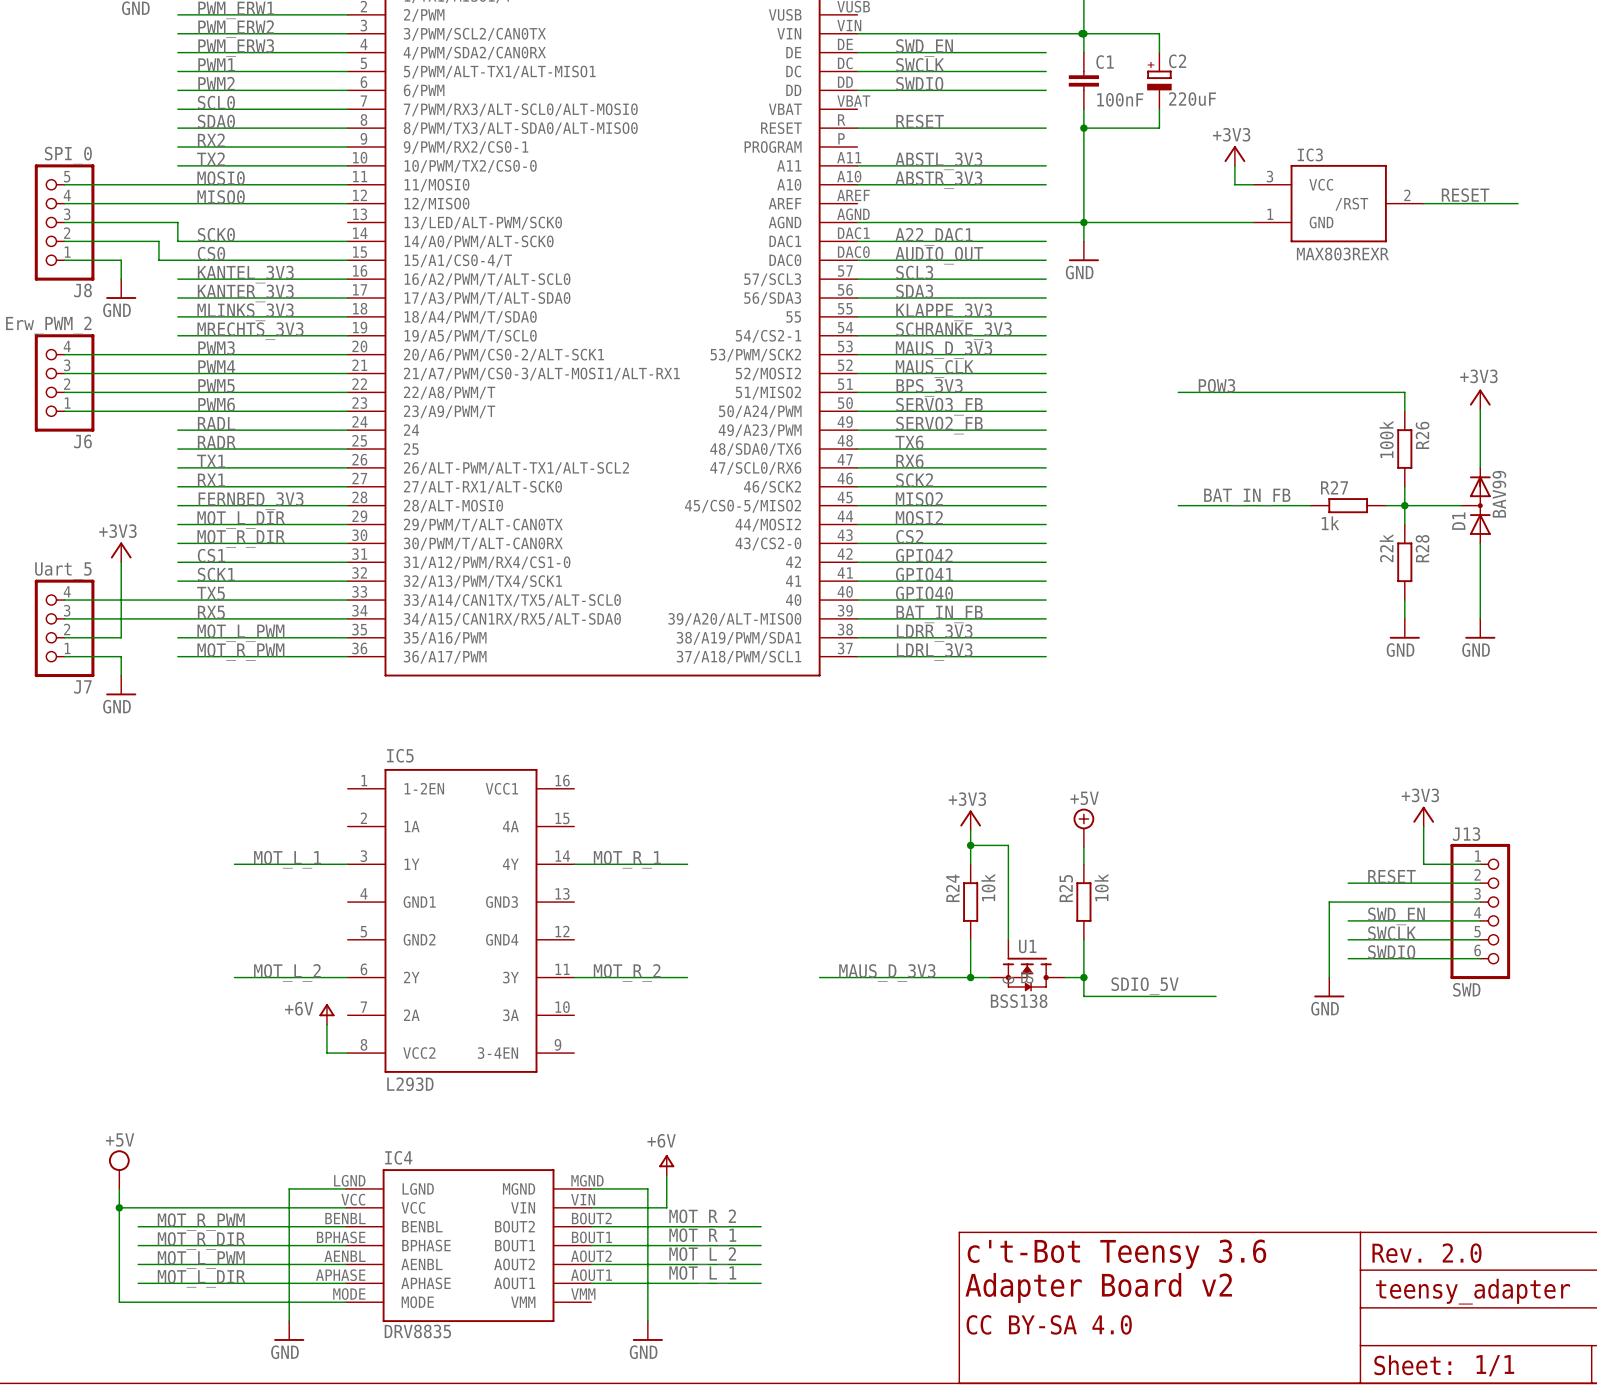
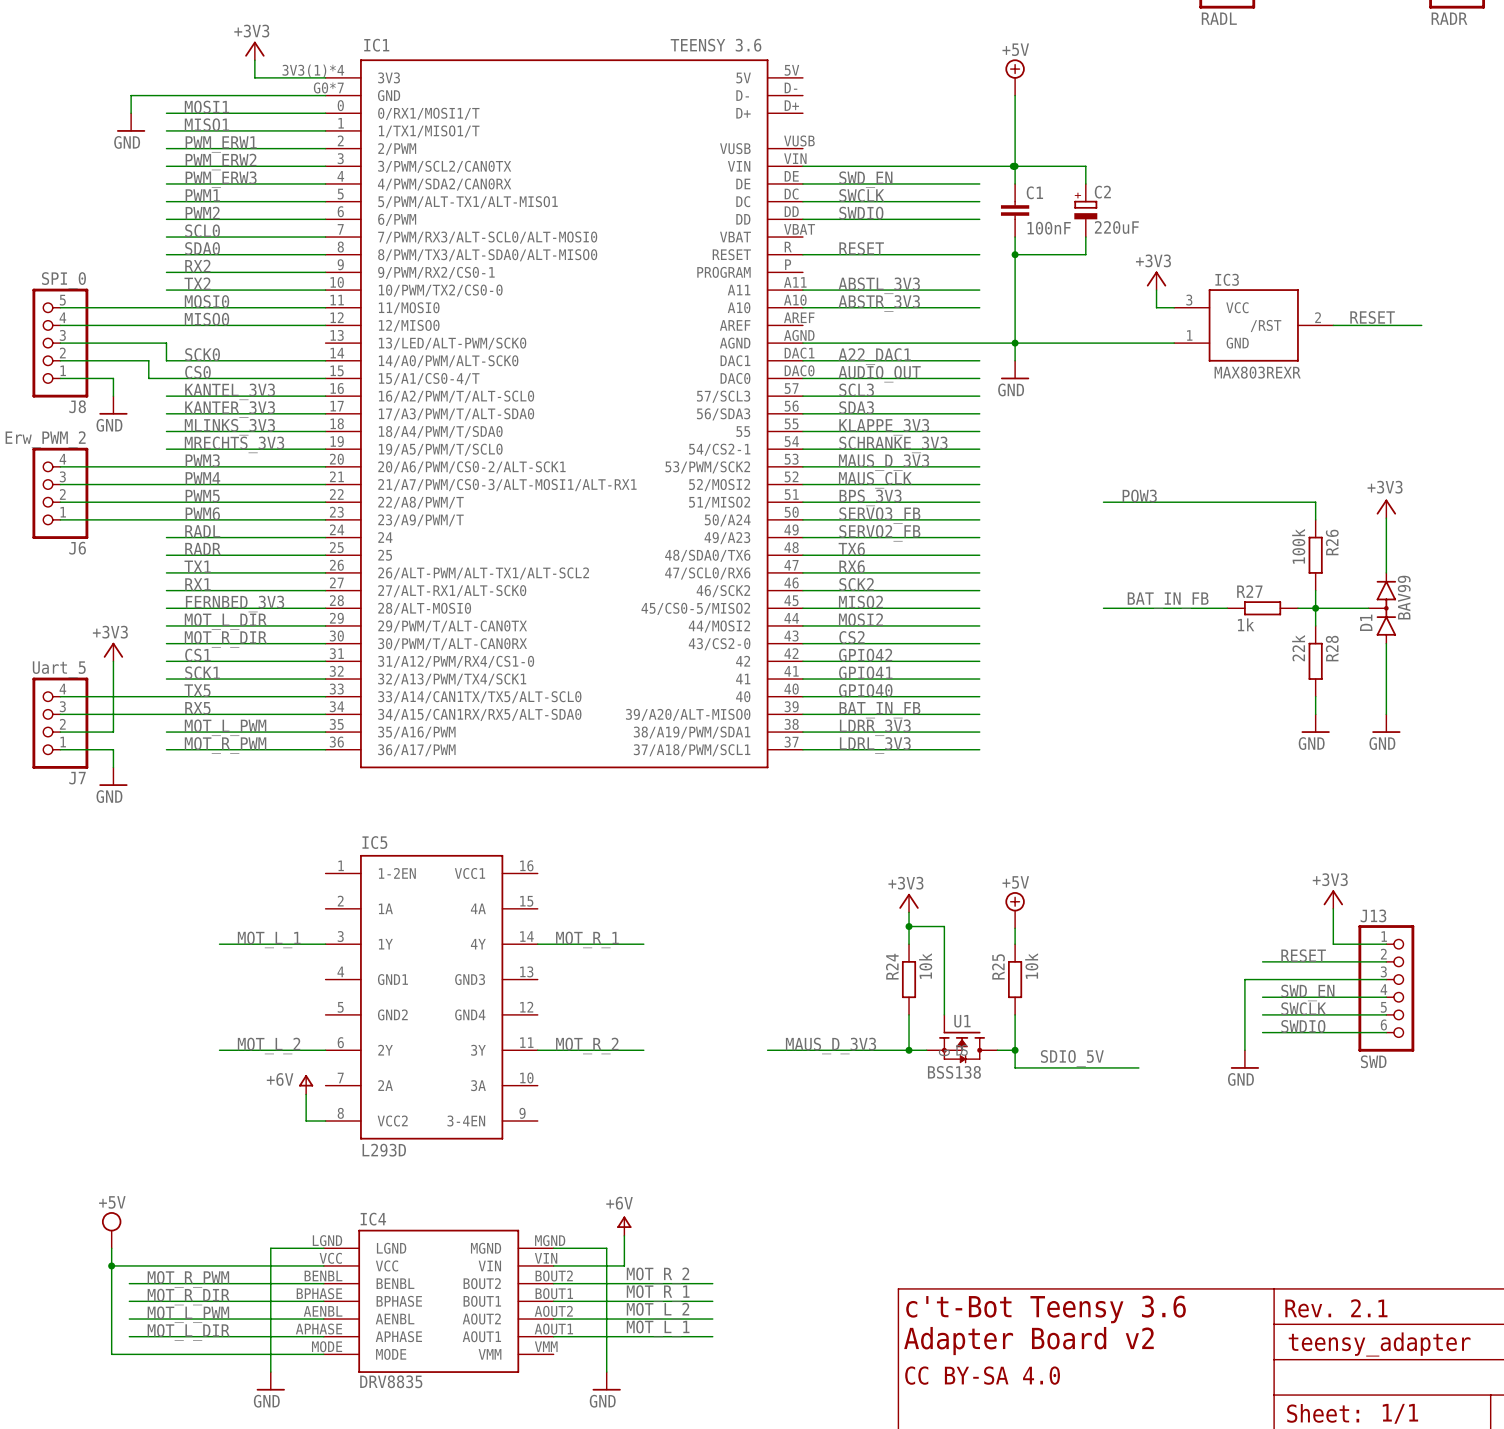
IC1 pin name: 50/A24/PWM (760, 411) -> 50/A24 (727, 520)
IC1 pin name: 49/A23/PWM (760, 430) -> 49/A23 (727, 538)
D1 symbol: [1461, 467, 1491, 544] -> [1368, 572, 1397, 645]
text: Rev. 2.0 (1426, 1253) -> Rev. 2.1 (1336, 1308)

